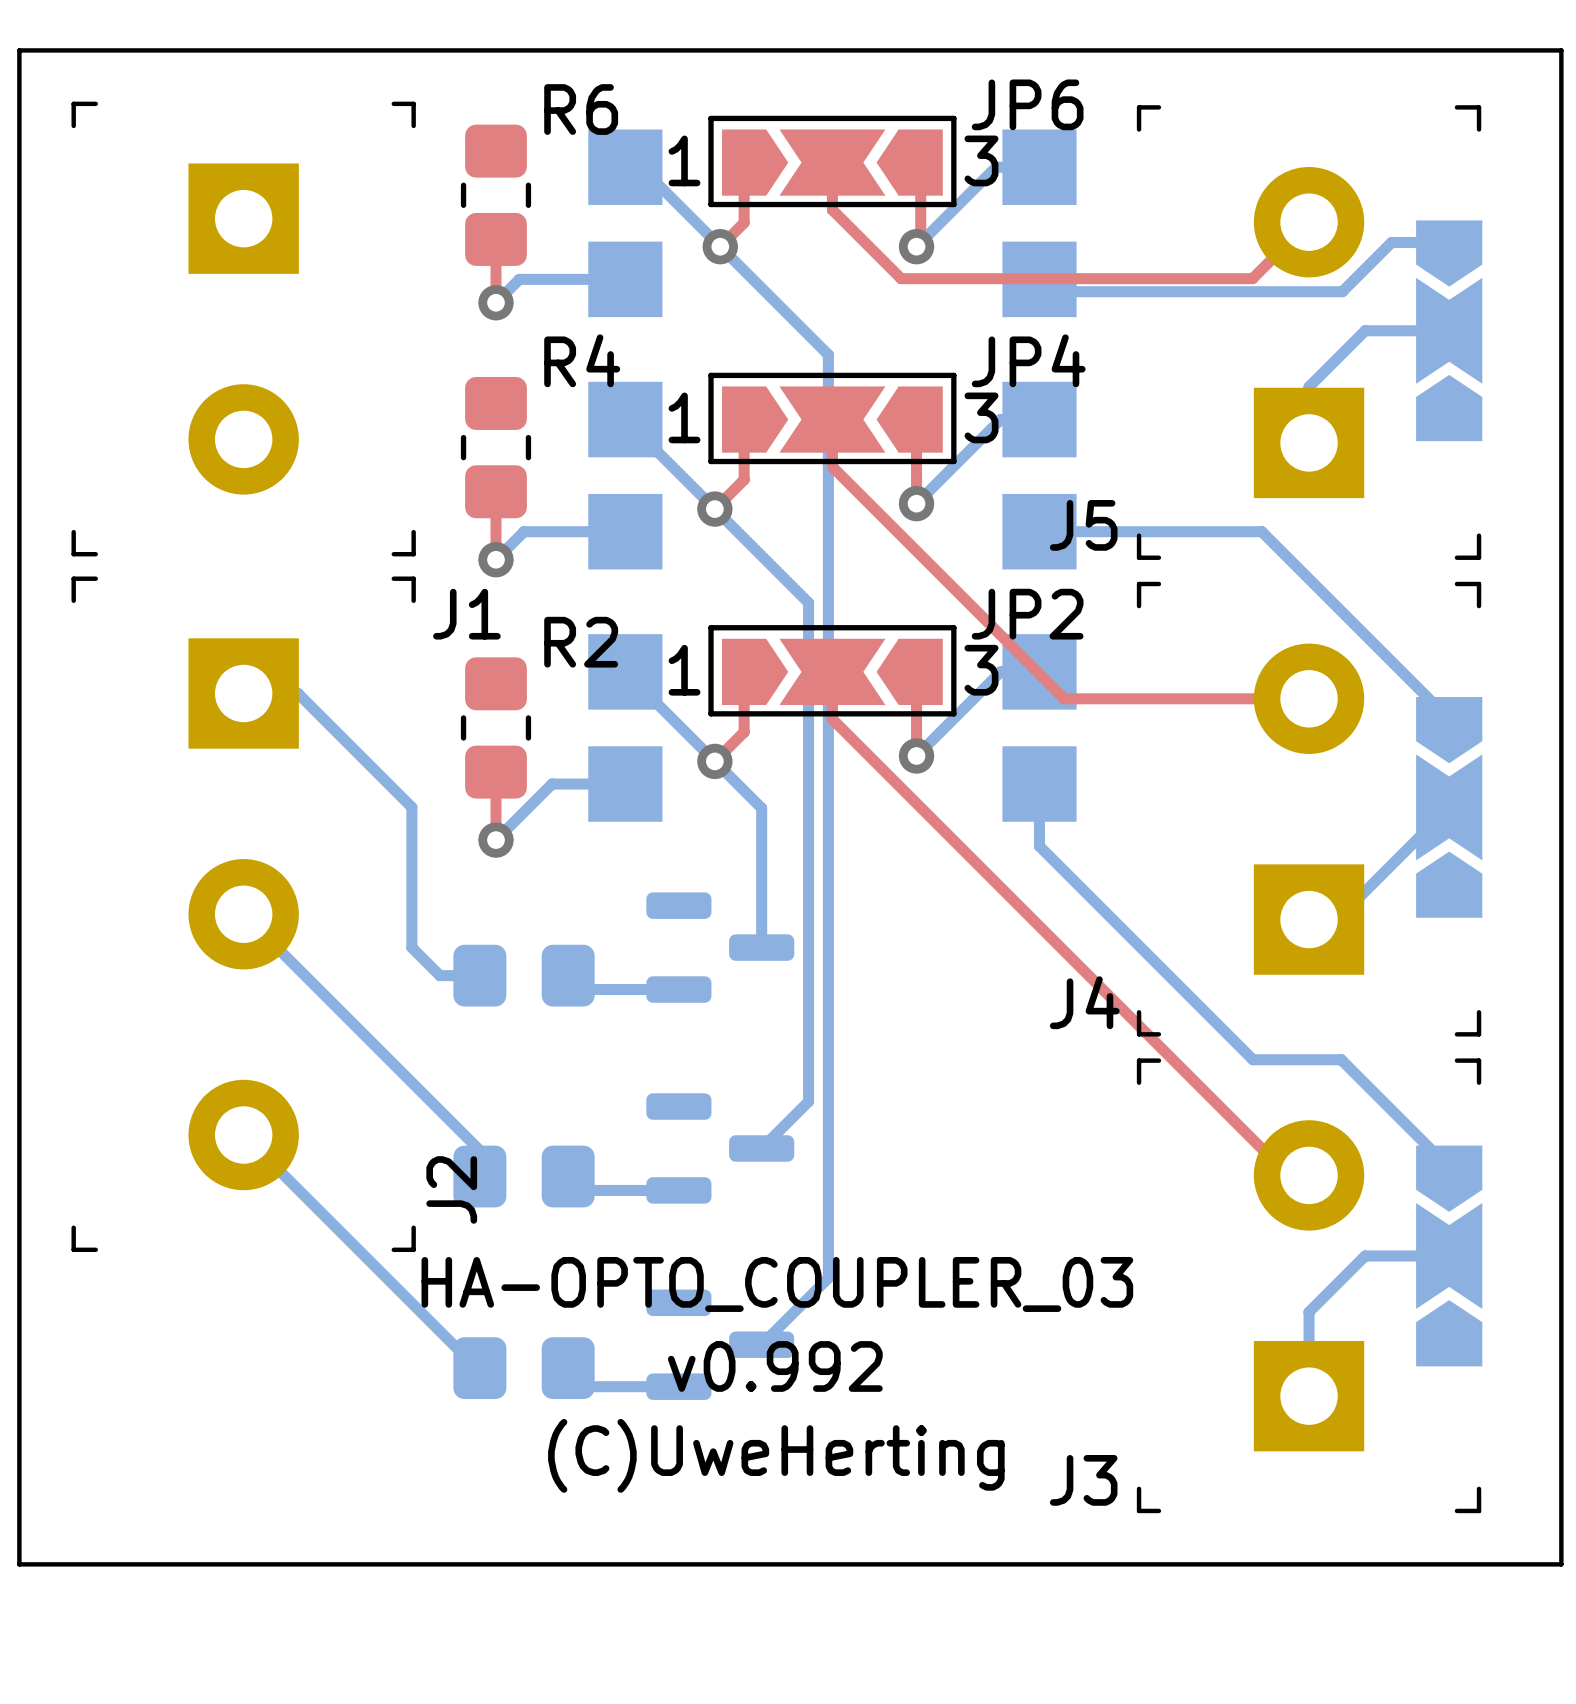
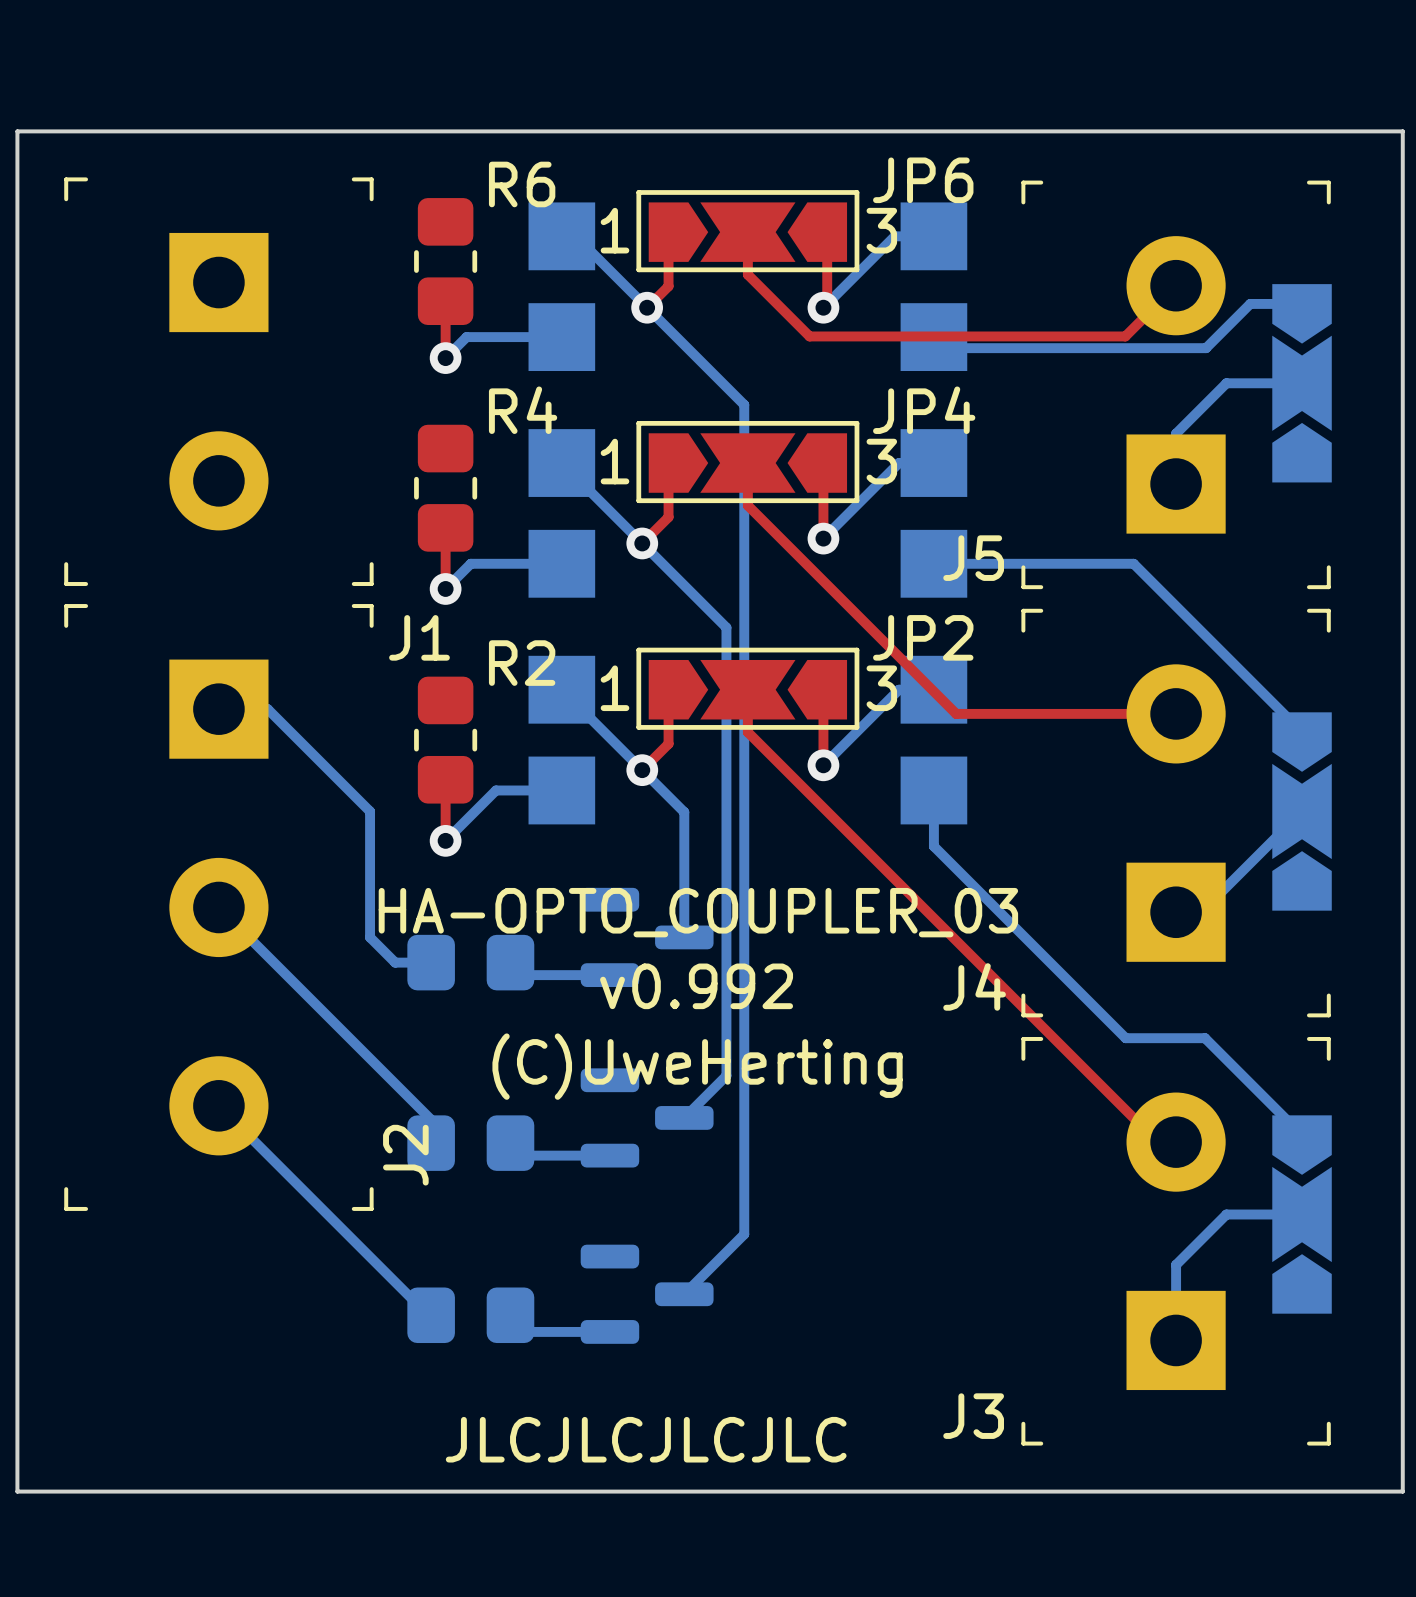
drawing position: (777, 1284) -> (698, 912)
drawing position: (775, 1366) -> (696, 986)
drawing position: (776, 1455) -> (697, 1066)
drawing: none -> [445, 1416, 847, 1463]

